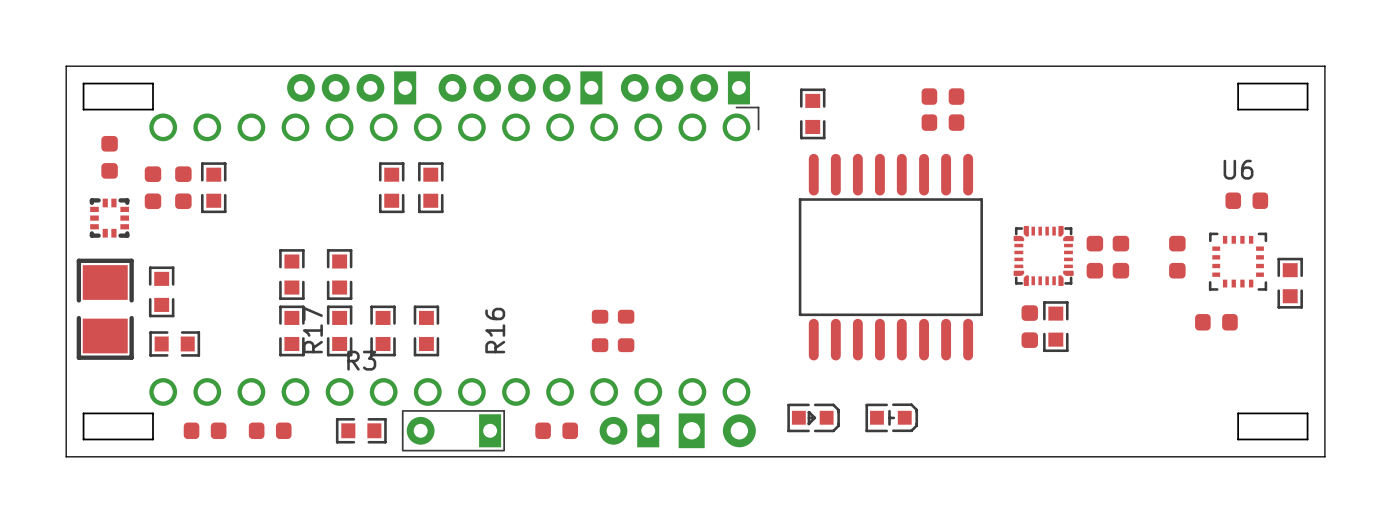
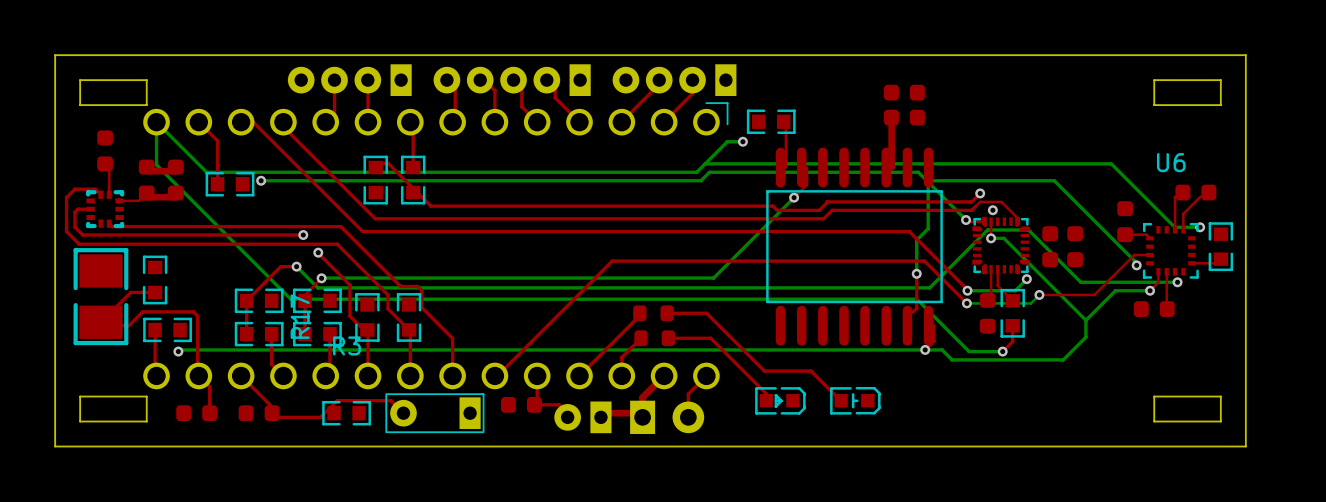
board edge: (66, 66) (1324, 66) (1324, 456) (66, 456) (66, 66) -> (55, 55) (55, 446) (1245, 446) (1245, 55) (55, 55)
board edge: (1238, 83) (1238, 109) -> (1187, 80) (1154, 80) (1154, 105) (1187, 105)
board edge: (1272, 83) (1307, 83) (1307, 109) (1272, 109) -> (1220, 80) (1220, 105)
top track: none -> (334, 84) (334, 113) (325, 122)
part position: (351, 87) -> (349, 80)
top track: none -> (455, 84) (455, 119) (452, 122) (452, 120) (455, 117)
top track: none -> (488, 84) (494, 90) (494, 122)
part position: (520, 87) -> (512, 80)
top track: none -> (521, 84) (521, 106) (537, 122)
top track: none -> (555, 84) (555, 97) (579, 122)
part position: (685, 87) -> (674, 80)
top track: none -> (659, 84) (621, 122)
top track: none -> (692, 84) (692, 93) (664, 122)
top track: none -> (368, 84) (368, 122)
part rotation: 0° (812, 113) -> 90° clockwise (771, 121)
top track: none -> (783, 121) (785, 123) (785, 167)
top track: none -> (198, 122) (217, 140) (217, 180)
top track: none -> (241, 122) (253, 122) (362, 231) (909, 231) (967, 290)
top track: none -> (283, 122) (283, 131) (287, 131) (375, 218) (823, 218) (832, 210) (971, 210) (980, 201) (1001, 201) (1017, 218) (1017, 221)
top track: none -> (410, 122) (413, 125) (413, 167)
top track: none -> (891, 121) (891, 167)
bottom track: none -> (742, 141) (727, 141) (696, 172) (206, 172)
via: none -> (742, 141)
top track: none -> (105, 163) (109, 168) (109, 194)
top track: none -> (384, 163) (388, 163) (430, 206) (772, 206) (777, 210) (819, 210) (827, 201) (971, 201) (980, 193)
bottom track: none -> (705, 163) (1111, 163) (1174, 227) (1200, 227)
top track: none -> (807, 167) (807, 184) (794, 197)
top track: none -> (146, 171) (175, 171)
bottom track: none -> (206, 172) (156, 122) (156, 164) (290, 299) (916, 299) (969, 351) (1002, 351)
part rotation: 0° (213, 187) -> 90° clockwise (230, 184)
bottom track: none -> (261, 180) (701, 180) (709, 172) (918, 172) (966, 220)
via: none -> (261, 180)
bottom track: none -> (926, 180) (1054, 180) (1136, 263) (1136, 265)
bottom track: none -> (928, 182) (928, 228) (916, 240) (916, 273)
top track: none -> (146, 193) (138, 200) (119, 200)
via: none -> (980, 193)
top track: none -> (100, 194) (95, 189) (75, 189) (66, 197) (66, 231) (79, 244) (337, 244) (388, 294) (388, 308) (404, 325) (404, 329) (410, 335) (410, 375)
top track: none -> (146, 197) (175, 197)
top track: none -> (1174, 196) (1175, 229)
top track: none -> (1200, 196) (1183, 213) (1183, 229)
bottom track: none -> (794, 197) (713, 278) (321, 278)
via: none -> (794, 197)
top track: none -> (90, 209) (78, 209) (75, 212) (75, 227) (82, 235) (303, 235)
via: none -> (992, 210)
top track: none -> (966, 220) (967, 221) (984, 221)
via: none -> (966, 220)
top track: none -> (991, 221) (991, 238)
top track: none -> (109, 223) (112, 226) (340, 226) (400, 286) (417, 286) (421, 290) (421, 307) (452, 338) (452, 375)
via: none -> (1200, 227)
top track: none -> (1125, 234) (1146, 234) (1149, 238)
via: none -> (303, 235)
bottom track: none -> (991, 238) (1003, 238) (1085, 320)
via: none -> (991, 238)
part position: (1177, 257) -> (1125, 221)
U6 position: (1238, 261) -> (1170, 250)
top track: none -> (318, 252) (349, 284) (349, 316) (363, 329) (368, 330) (368, 375)
via: none -> (318, 252)
top track: none -> (1149, 254) (1134, 254) (1094, 294) (1039, 294)
top track: none -> (1220, 259) (1216, 263) (1191, 263)
part: (291, 274) -> none
part: (339, 274) -> none
via: none -> (1136, 265)
top track: none -> (296, 266) (280, 266) (246, 300) (246, 334)
bottom track: none -> (296, 266) (317, 287) (929, 287) (987, 229) (1028, 229) (1080, 282) (1177, 282)
via: none -> (296, 266)
top track: none -> (991, 269) (991, 296) (988, 299)
top track: none -> (997, 269) (997, 285) (1012, 300)
top track: none -> (1158, 271) (1158, 282) (1150, 290)
top track: none -> (1166, 271) (1167, 309)
part position: (1290, 283) -> (1220, 246)
top track: none -> (916, 273) (916, 308) (912, 312)
via: none -> (916, 273)
top track: none -> (321, 278) (304, 294) (304, 334)
via: none -> (321, 278)
bottom track: none -> (1026, 279) (1015, 290) (967, 290)
via: none -> (1026, 279)
via: none -> (1177, 282)
via: none -> (967, 290)
bottom track: none -> (1150, 290) (1115, 290) (1085, 320)
via: none -> (1150, 290)
top track: none -> (155, 292) (130, 292) (100, 322)
bottom track: none -> (1039, 294) (1030, 303) (966, 303)
via: none -> (1039, 294)
part: none -> (259, 300)
part: none -> (317, 300)
top track: none -> (966, 303) (924, 261) (612, 261) (497, 375) (494, 375)
via: none -> (966, 303)
part position: (1216, 322) -> (1154, 309)
top track: none -> (636, 313) (636, 318) (579, 375) (575, 372)
part: none -> (653, 313)
top track: none -> (664, 313) (706, 313) (764, 371) (810, 371) (841, 400)
part: (291, 330) -> none
part: (339, 330) -> none
R16 name: R16 (495, 330) -> none
part: (600, 330) -> none
part: (626, 330) -> none
bottom track: none -> (1085, 320) (1085, 337) (1063, 359) (952, 359) (942, 349) (180, 349) (178, 351)
top track: none -> (100, 325) (128, 325) (142, 311) (193, 311) (197, 316) (197, 374) (209, 386) (209, 413)
top track: none -> (933, 325) (933, 341) (925, 349)
top track: none -> (1012, 325) (1012, 341) (1002, 351)
top track: none -> (155, 329) (156, 375)
part: none -> (259, 334)
top track: none -> (271, 334) (271, 364) (283, 375)
part: none -> (317, 334)
top track: none -> (329, 334) (329, 371) (325, 375)
top track: none -> (641, 338) (621, 357) (621, 375)
part: none -> (654, 338)
top track: none -> (668, 338) (710, 338) (766, 393) (766, 400)
via: none -> (925, 349)
via: none -> (178, 351)
via: none -> (1002, 351)
top track: none -> (241, 375) (272, 406) (272, 413) (276, 417) (320, 417) (337, 400) (390, 400) (403, 413) (392, 413)
top track: none -> (664, 375) (642, 397) (642, 413) (600, 413)
top track: none -> (706, 375) (688, 394) (688, 413)
top track: none -> (534, 378) (537, 375) (537, 402) (534, 404) (559, 404) (567, 413)
board edge: (1238, 413) (1238, 439) -> (1187, 396) (1154, 396) (1154, 421) (1187, 421)
board edge: (1272, 413) (1307, 413) (1307, 439) (1272, 439) -> (1220, 396) (1220, 421)
part position: (556, 430) -> (521, 404)
part position: (629, 430) -> (582, 417)
part position: (717, 430) -> (667, 417)

